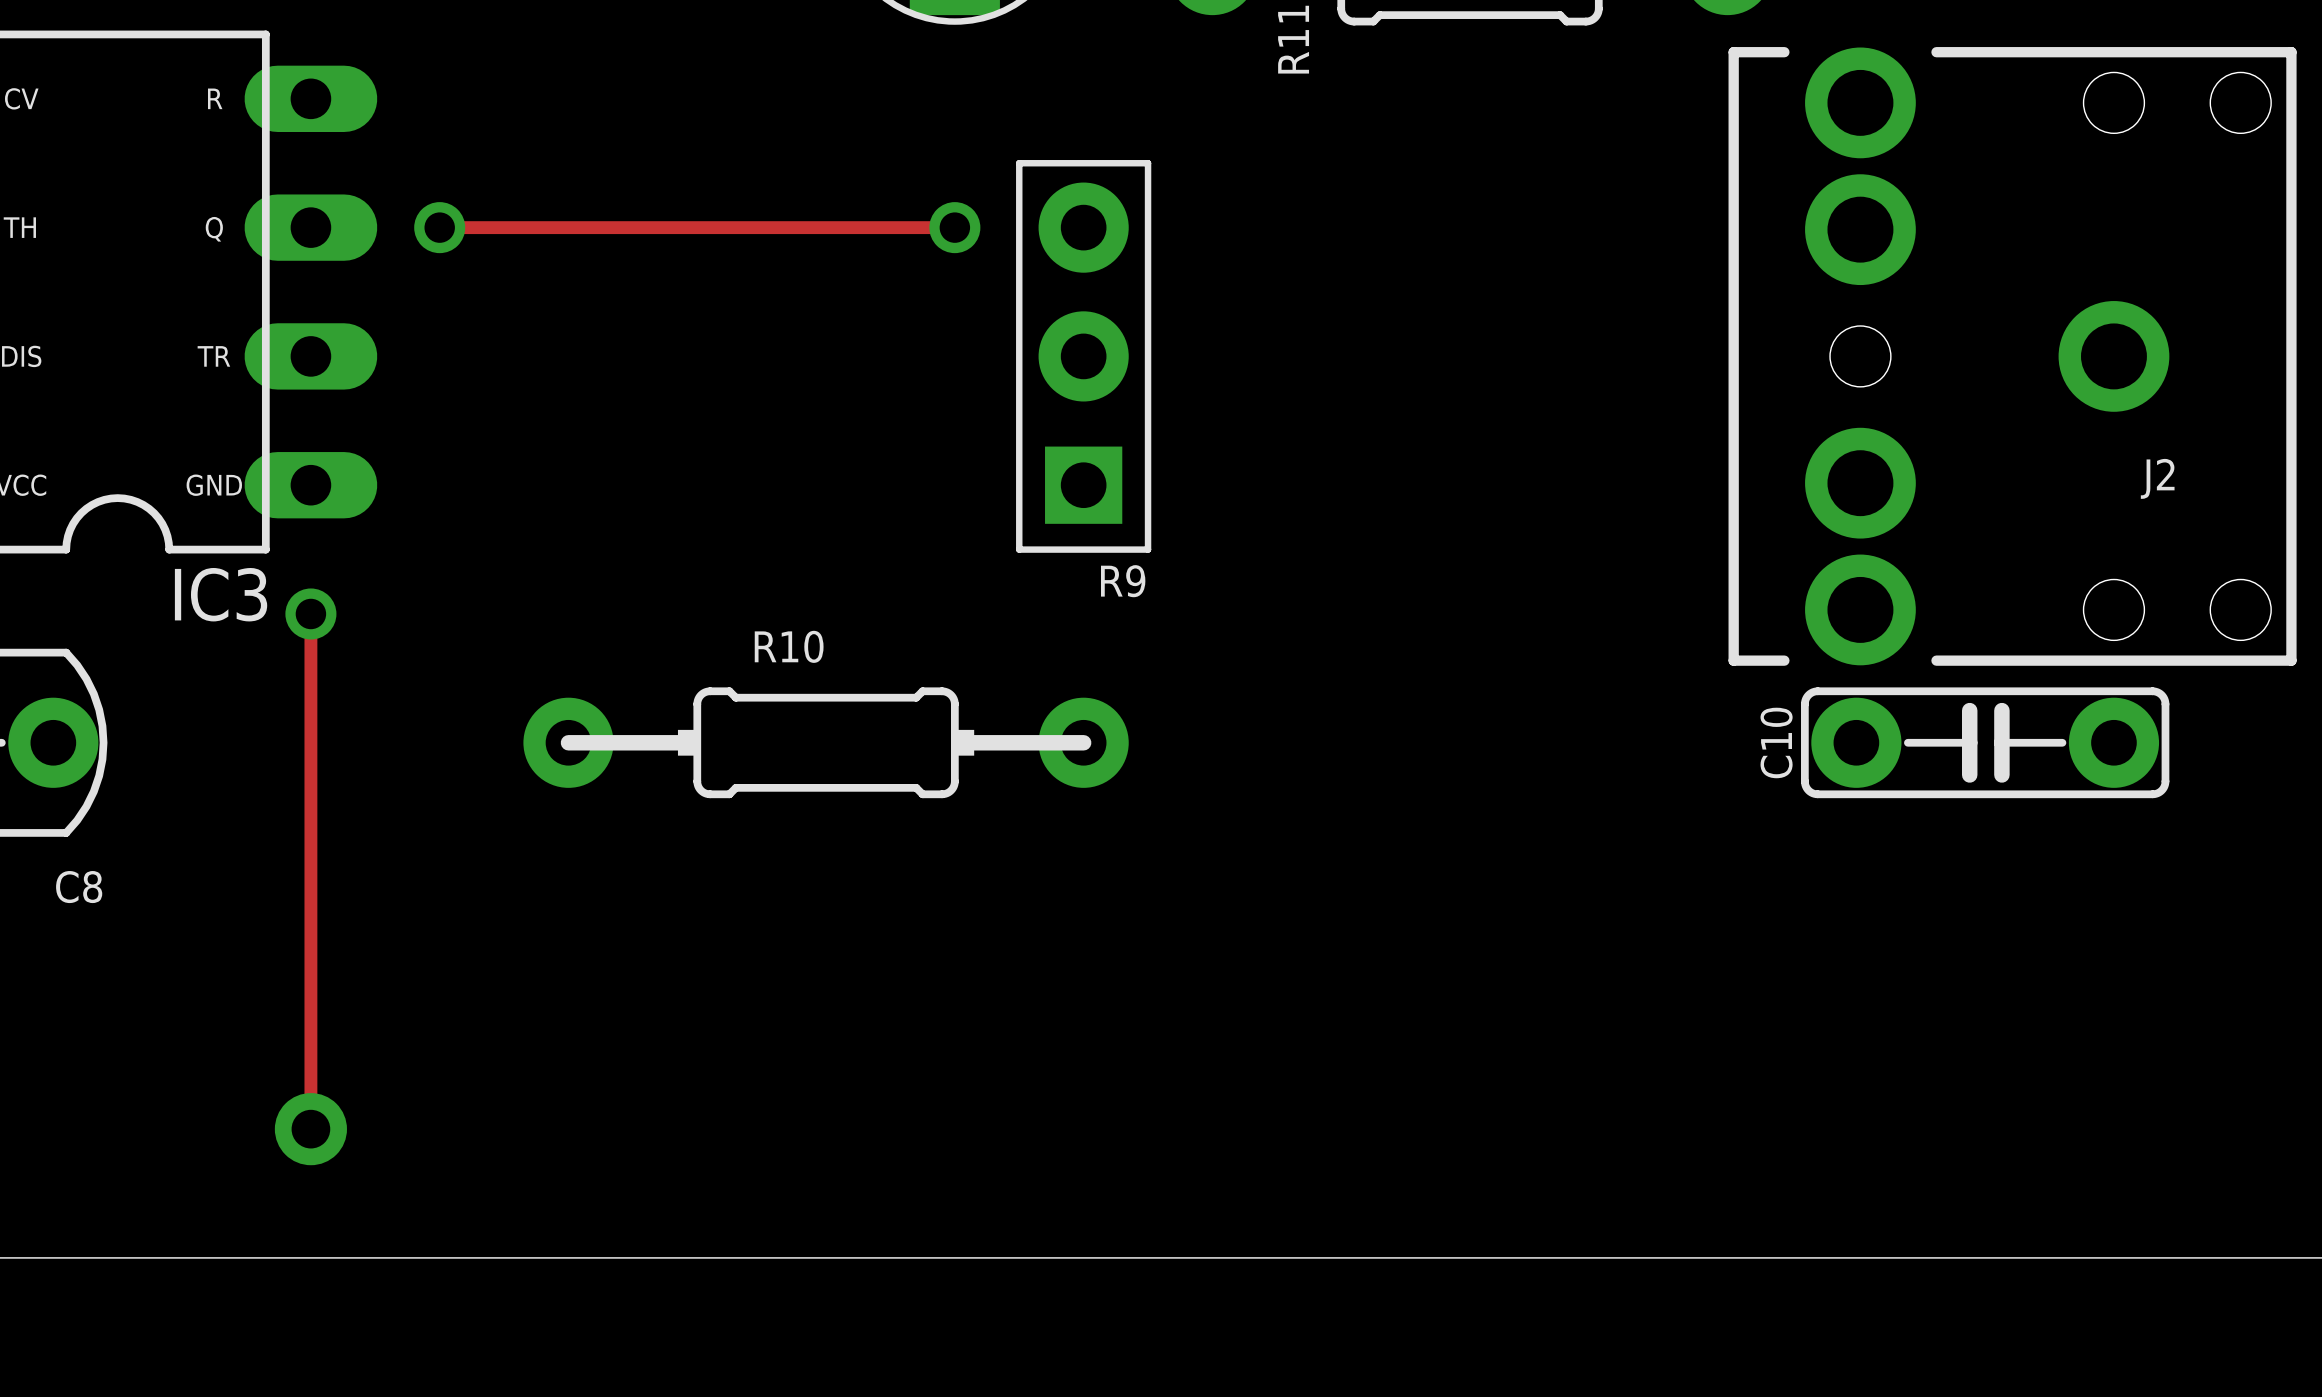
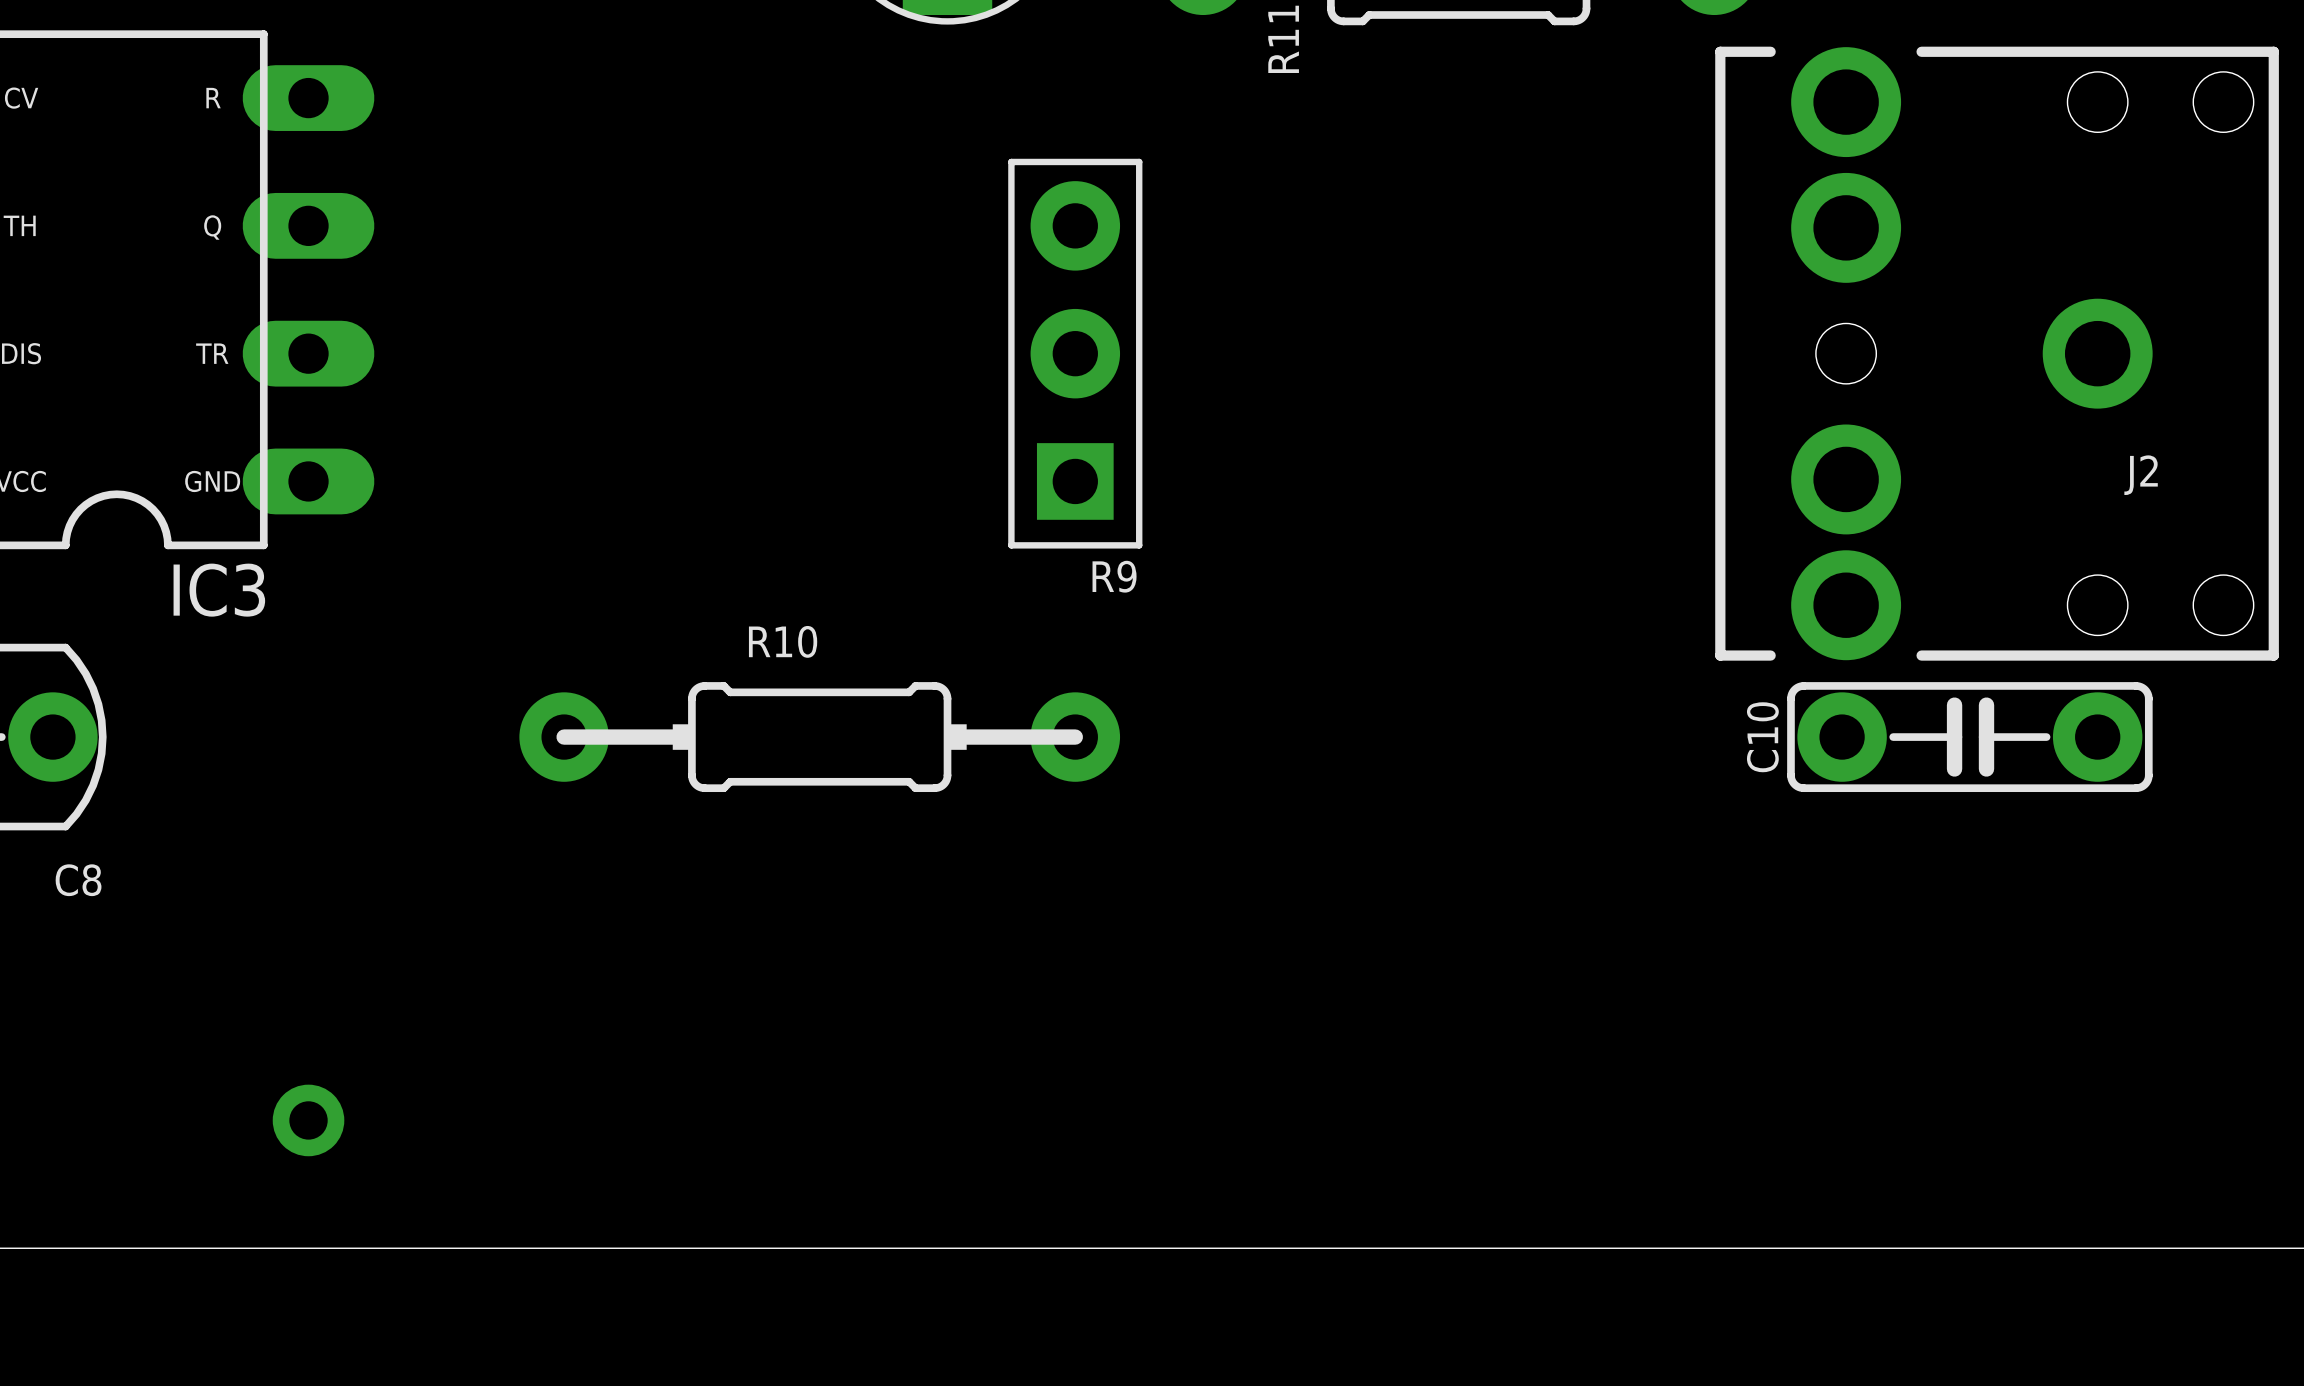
track: (439, 227) (954, 227) -> none
via: (439, 227) -> none
via: (954, 227) -> none
track: (310, 613) (310, 1129) -> none
via: (310, 613) -> none

